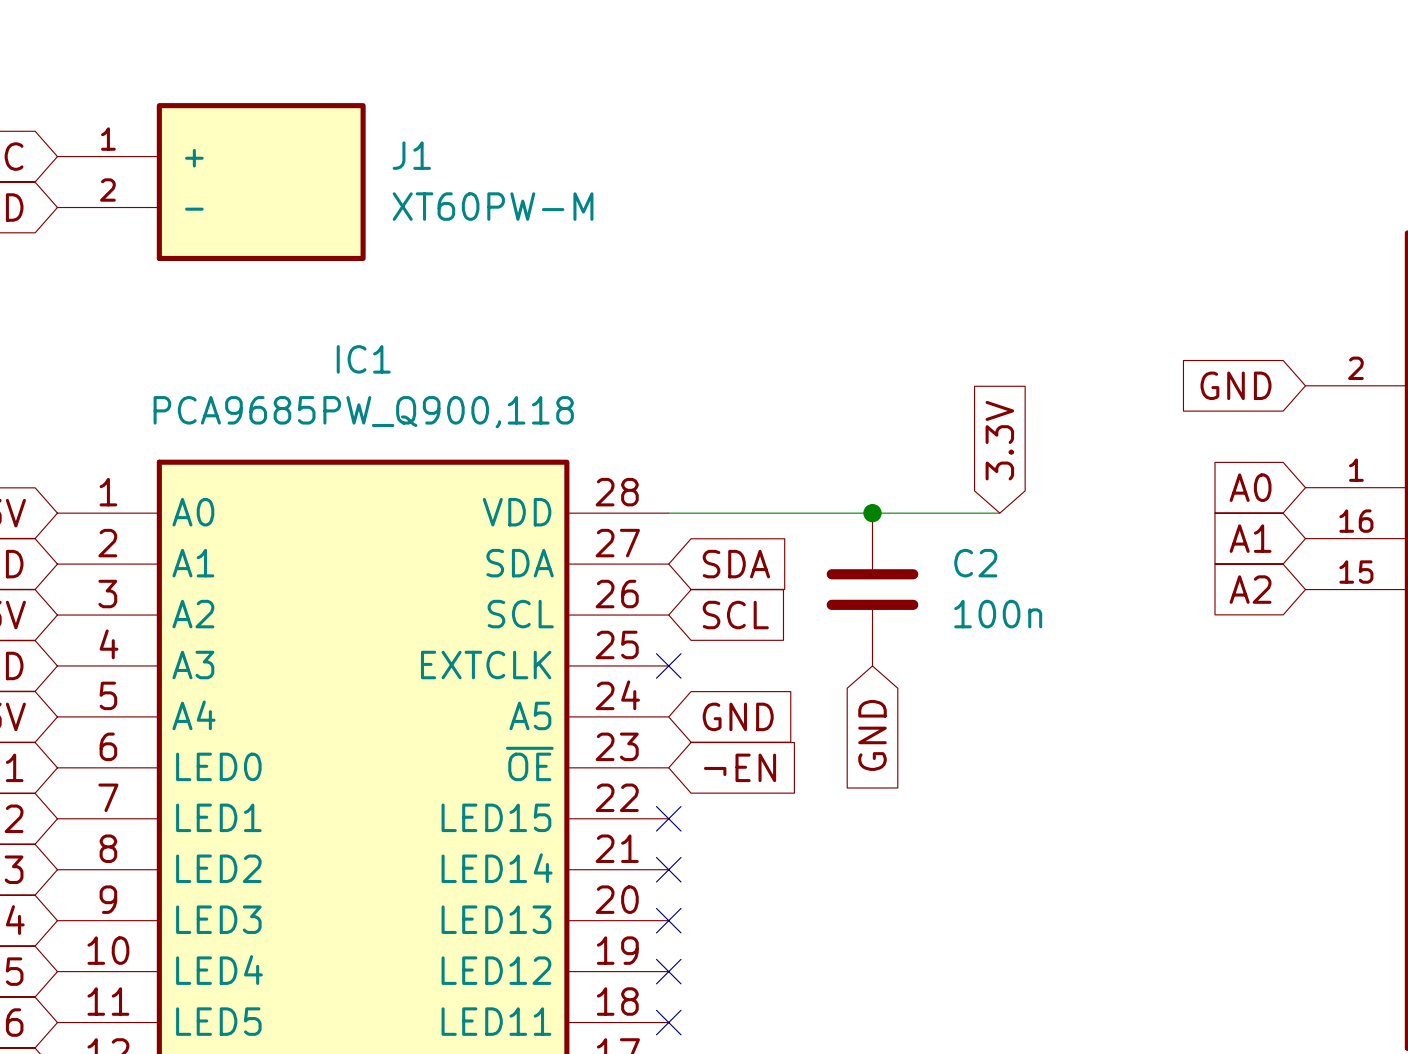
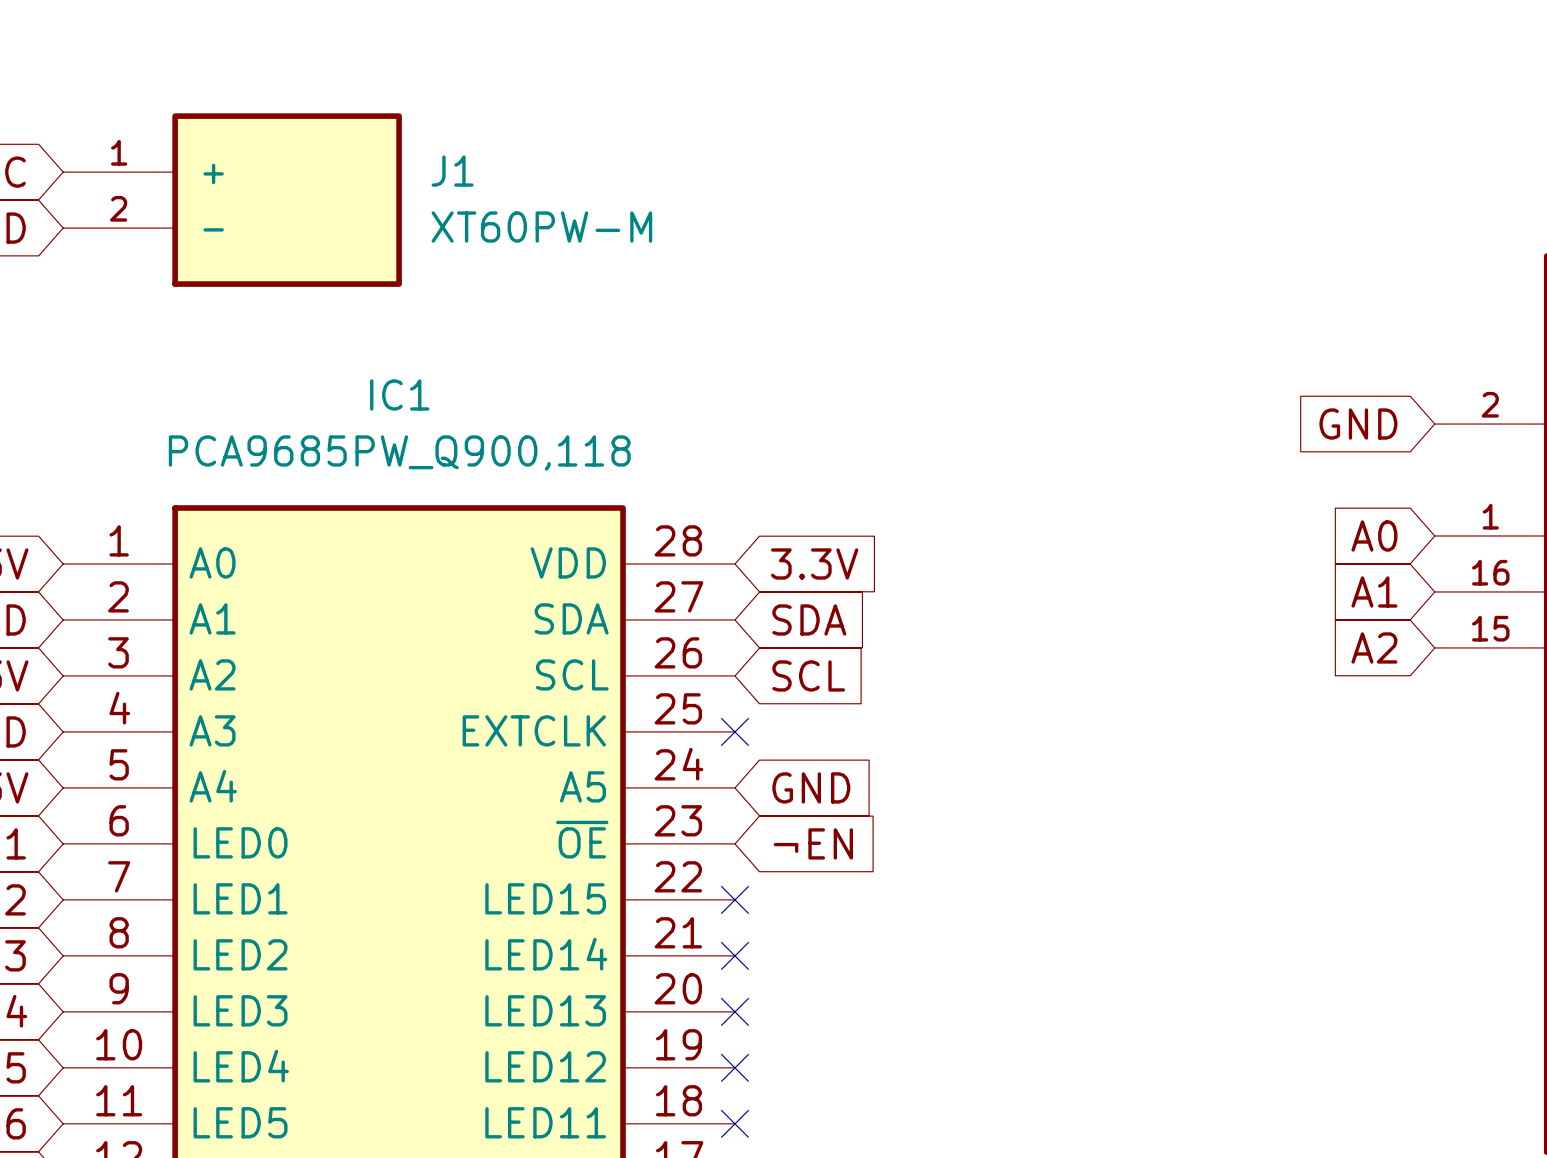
global label rotation: 0° (999, 440) -> 90° clockwise (814, 563)
global label position: 3.3V (999, 440) -> 3.3V (814, 563)
wire: (668, 513) (999, 513) -> none
junction: (872, 513) -> none
C2: 100n (872, 589) -> none
global label: GND (872, 735) -> none

